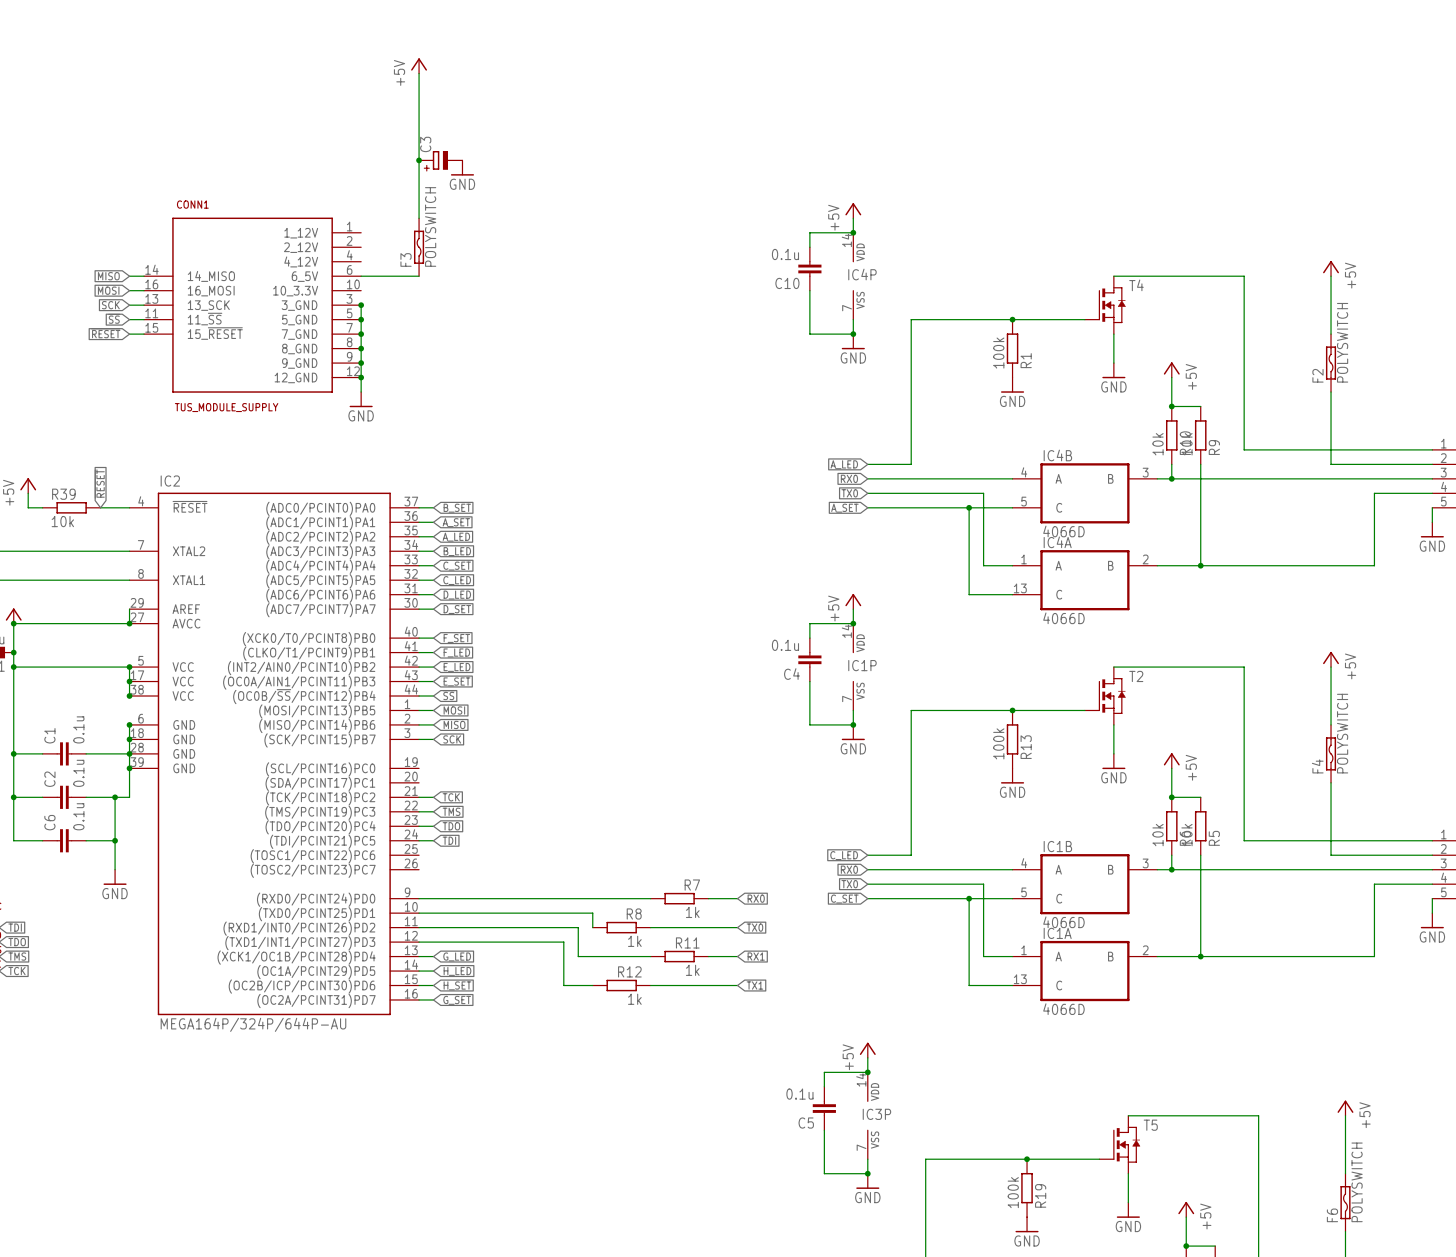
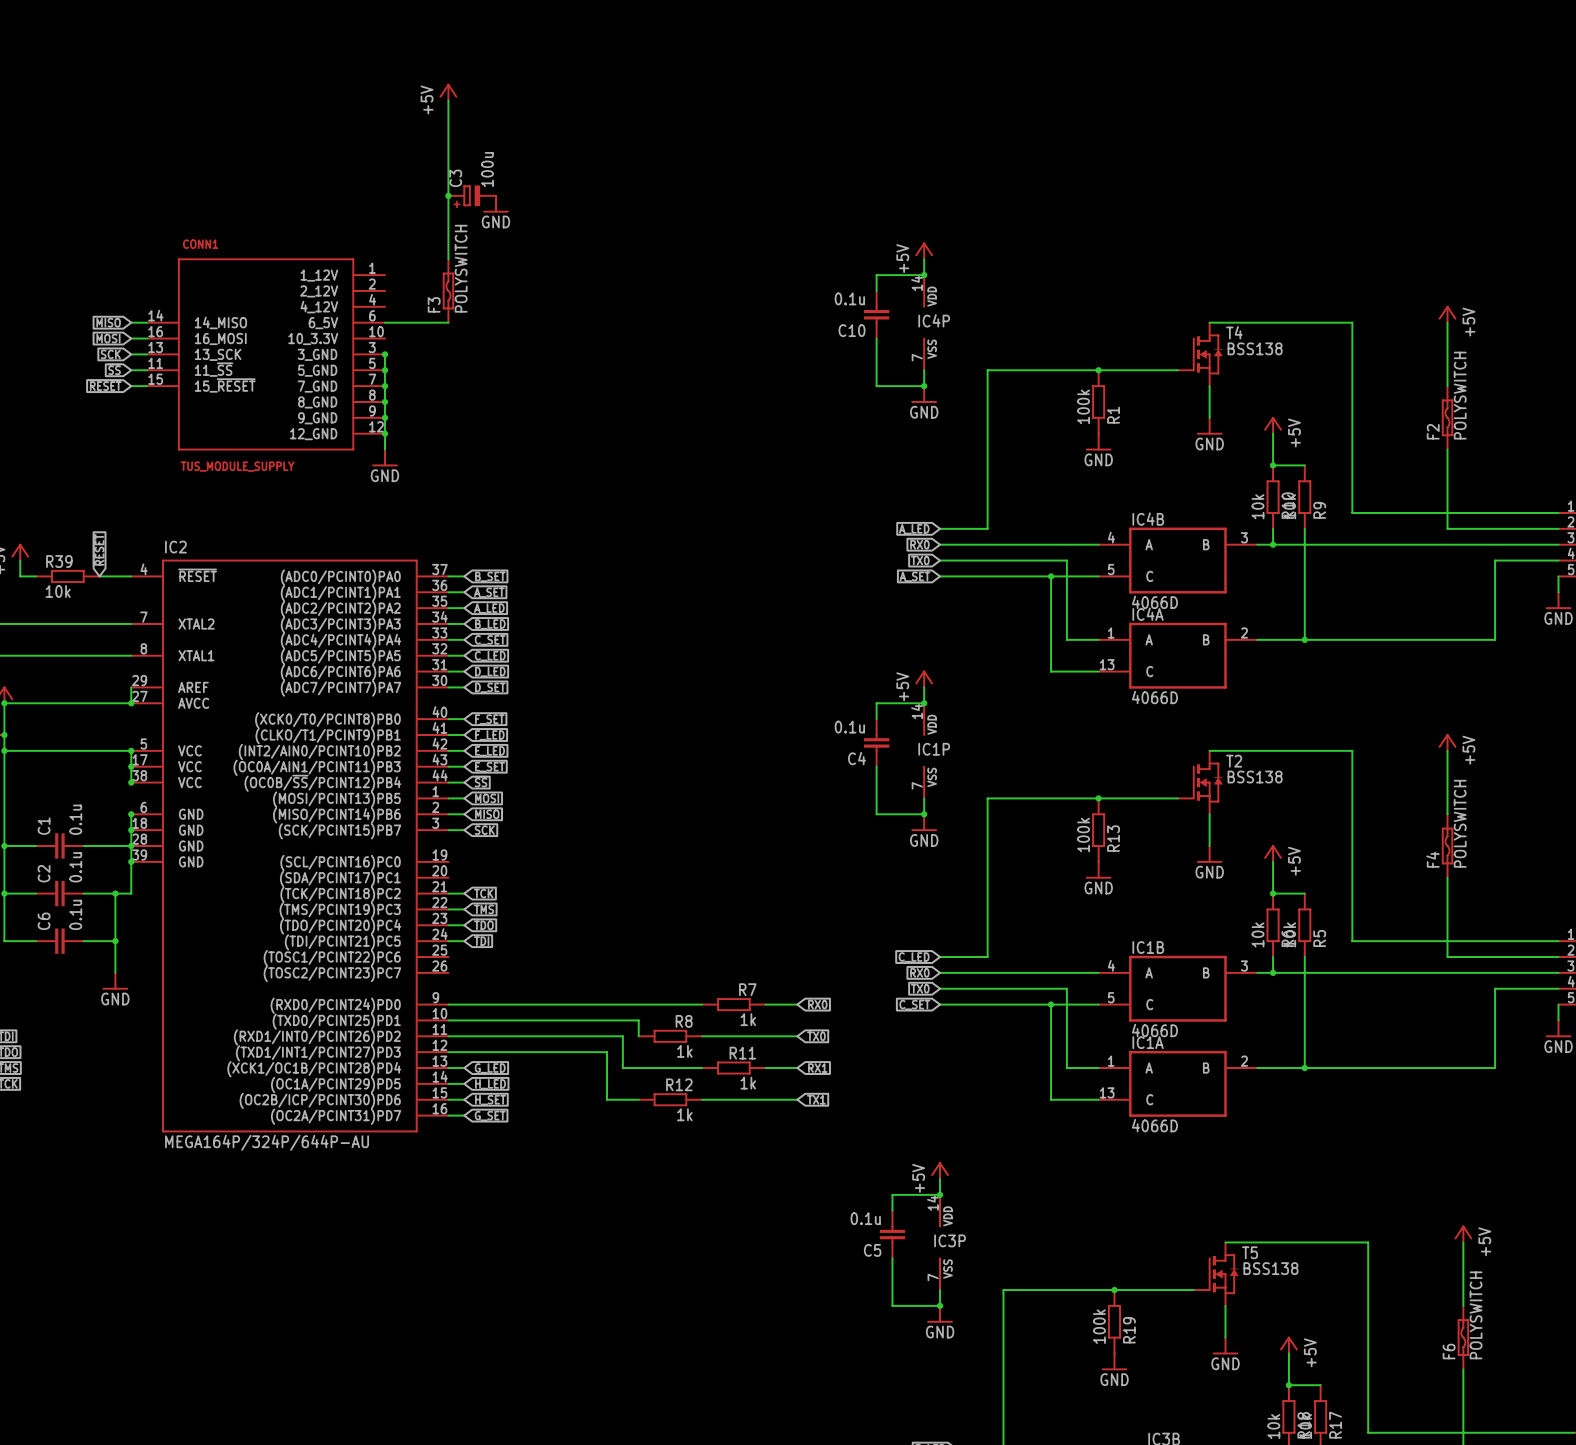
C3 value: none -> 100u (487, 169)
T4 value: none -> BSS138 (1255, 348)
T2 value: none -> BSS138 (1255, 777)
T5 value: none -> BSS138 (1270, 1268)

